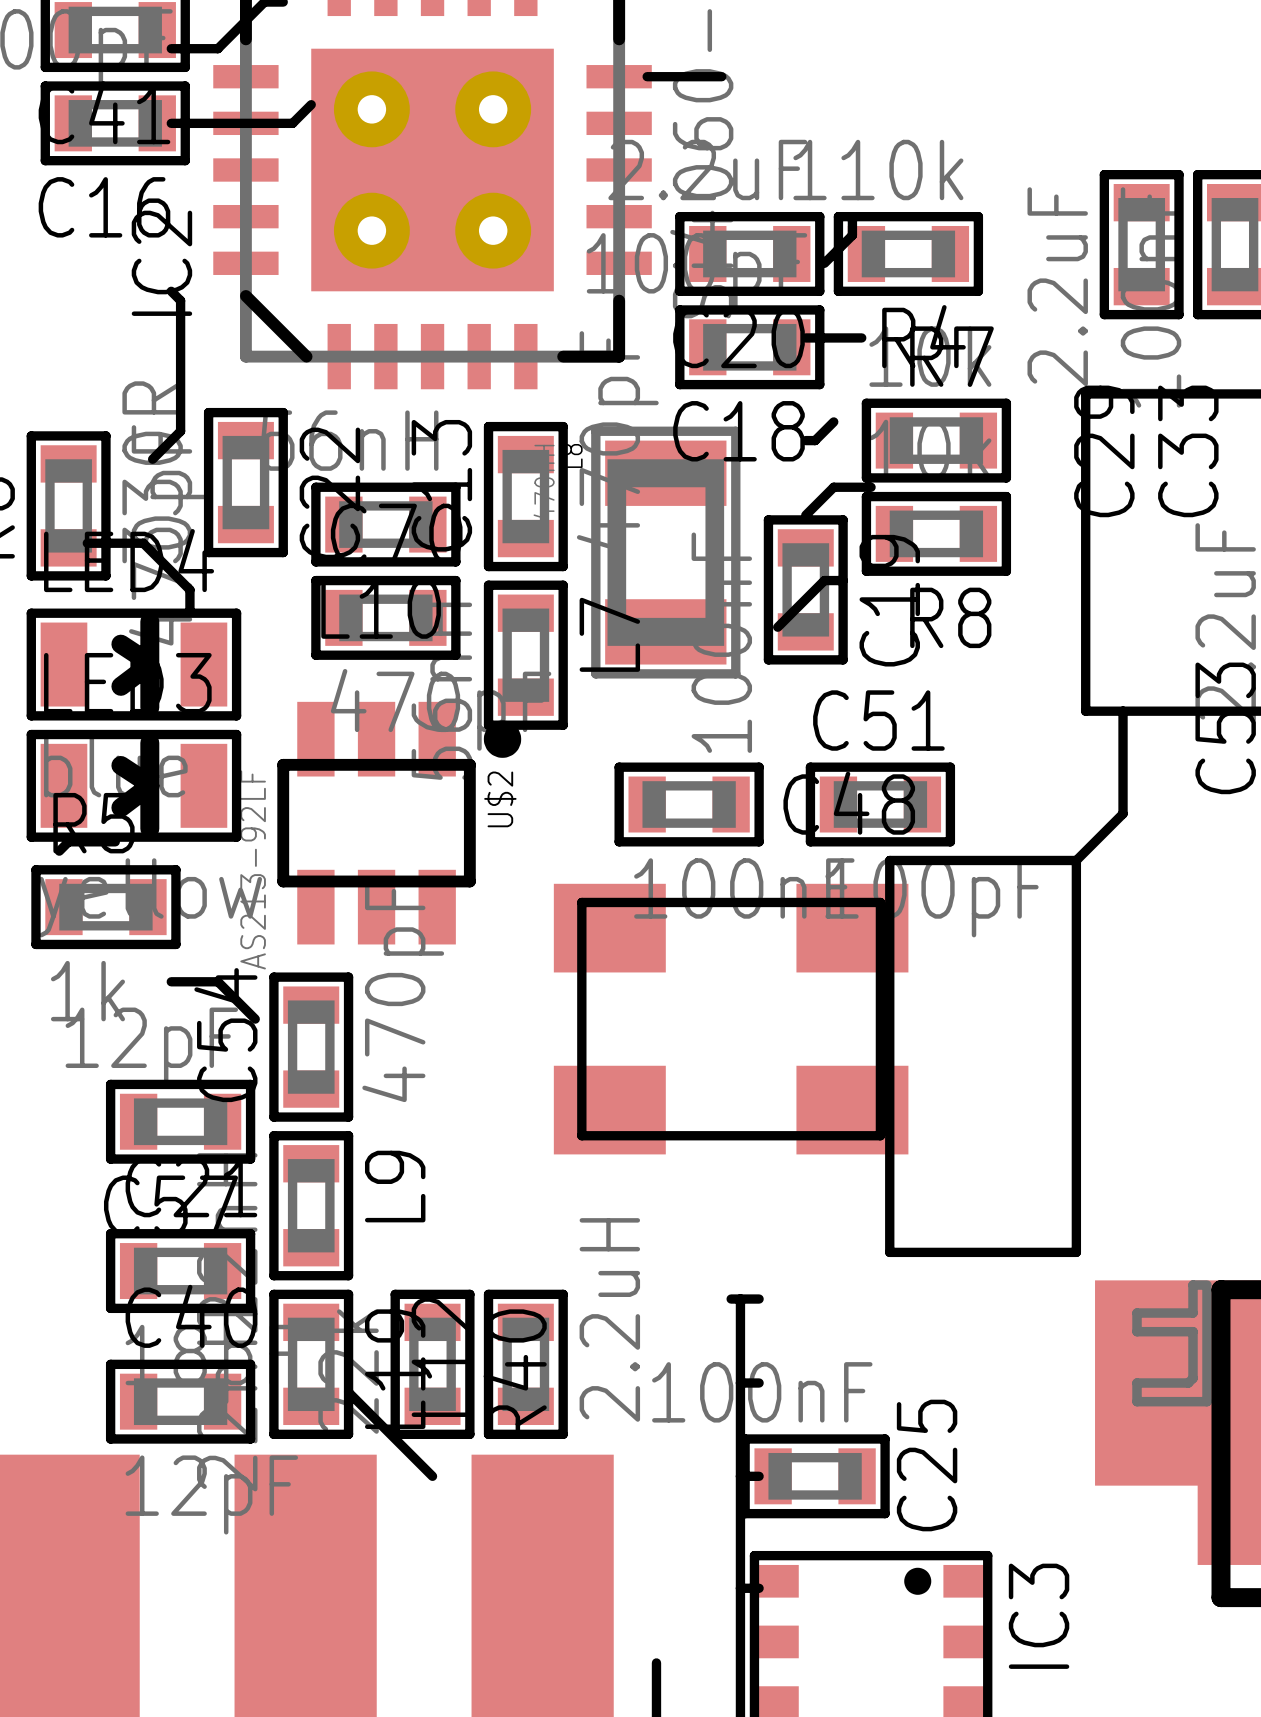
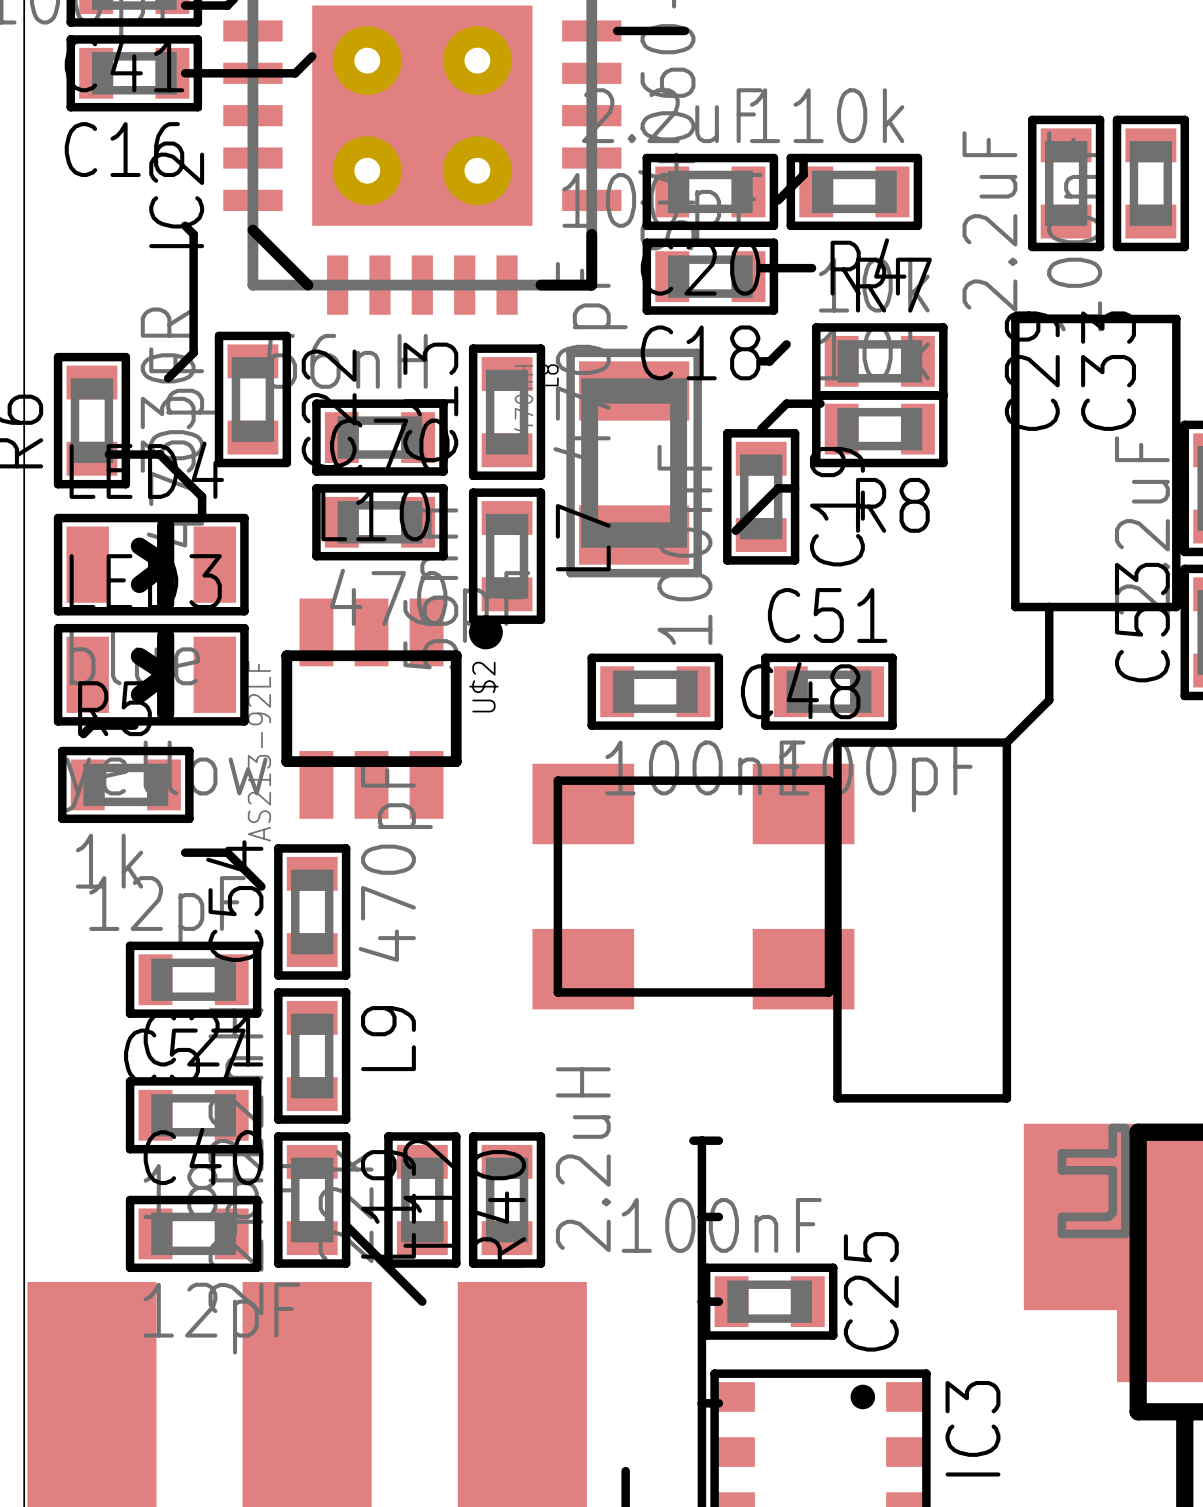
R8 position: (936, 533) -> (879, 429)

